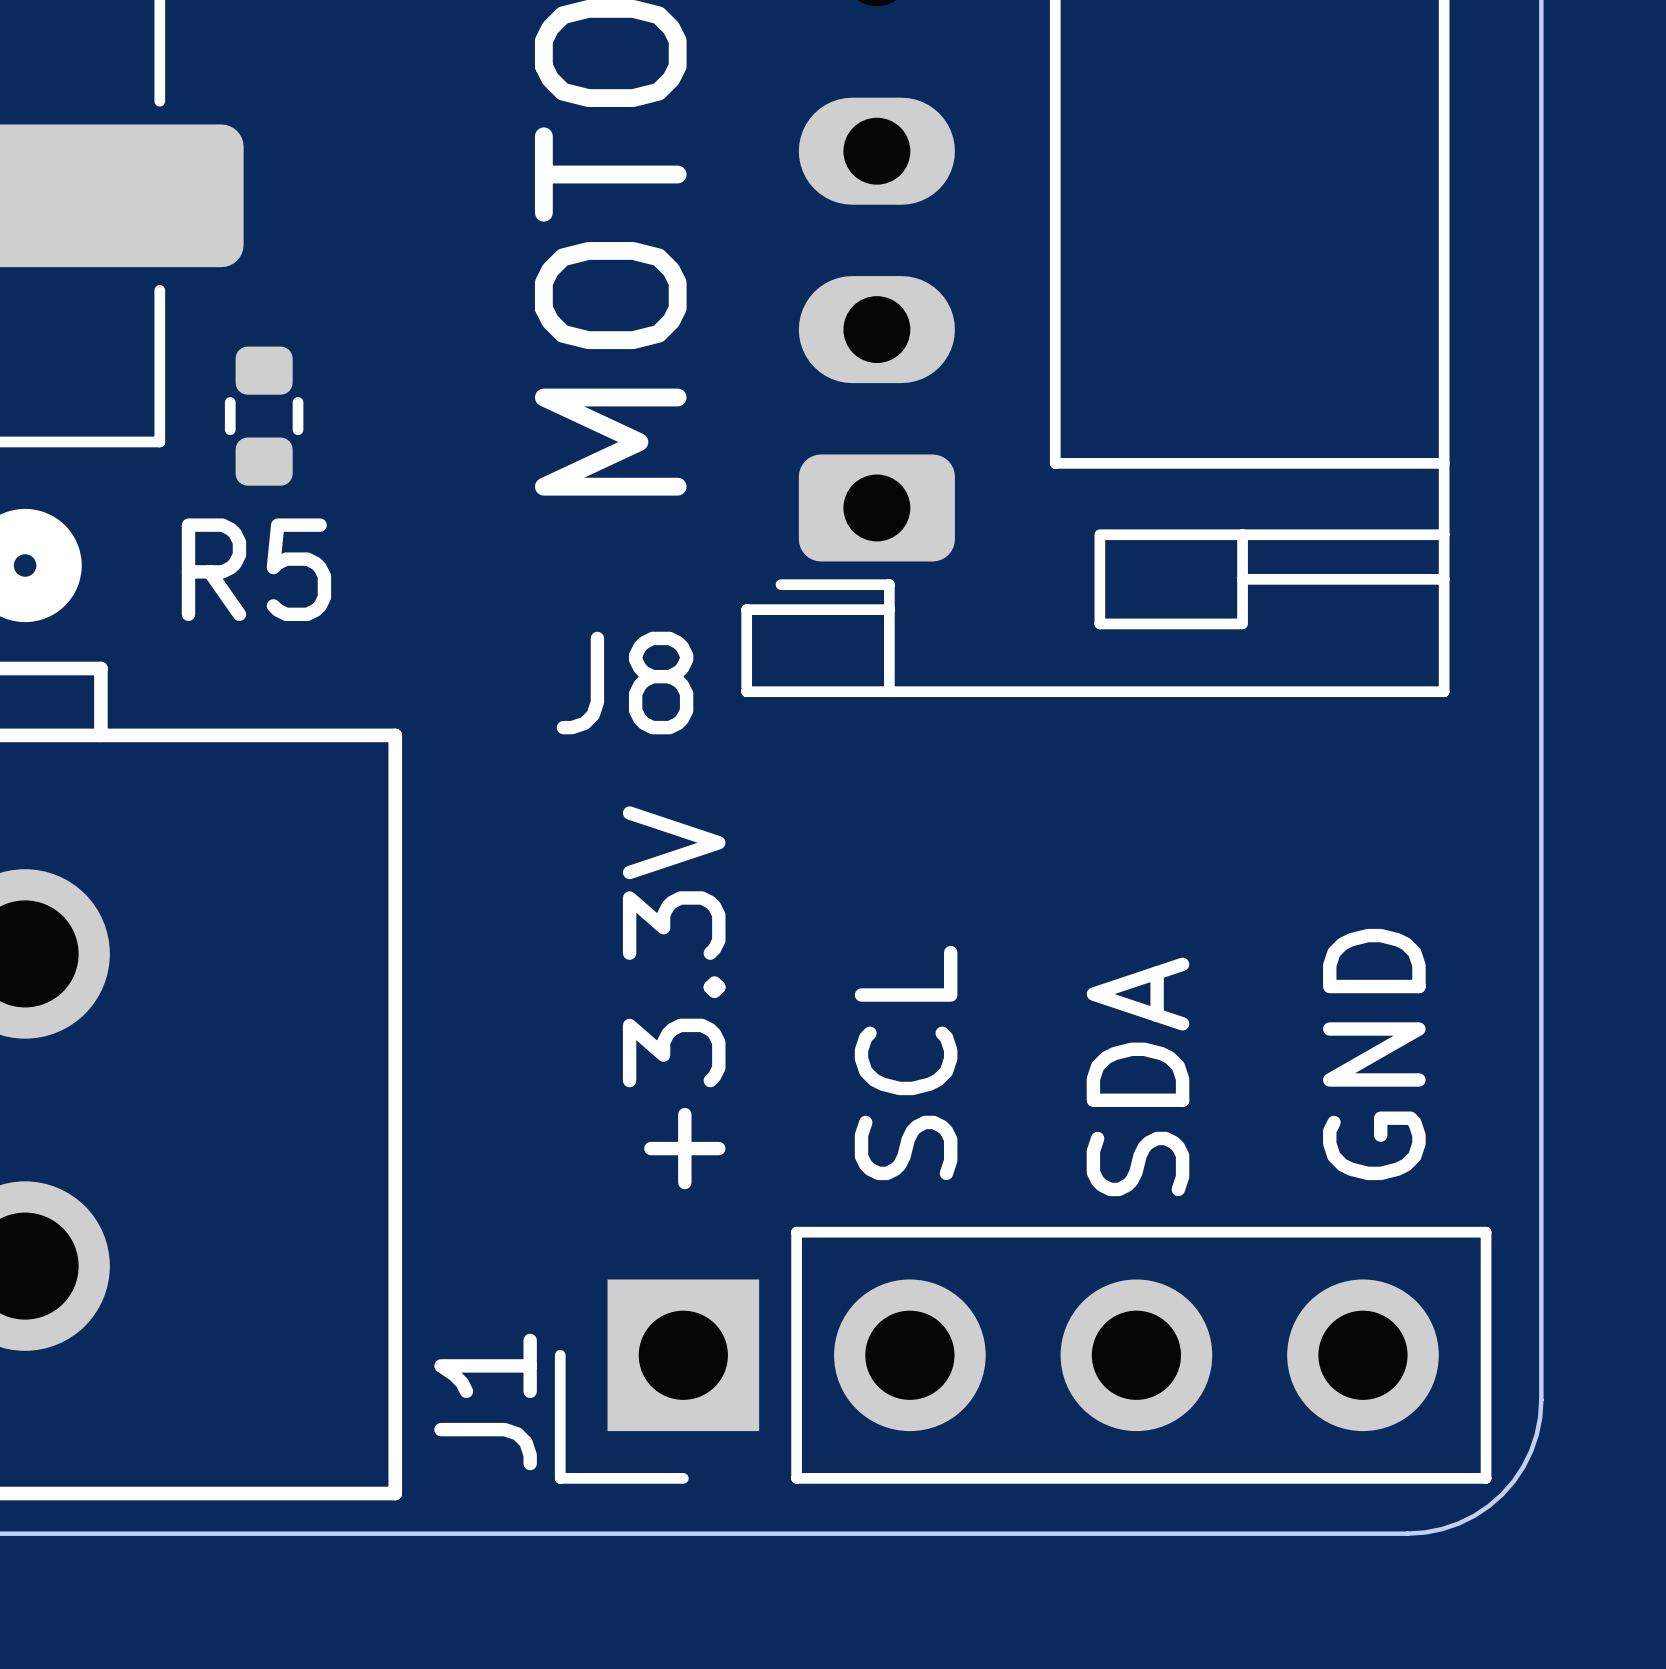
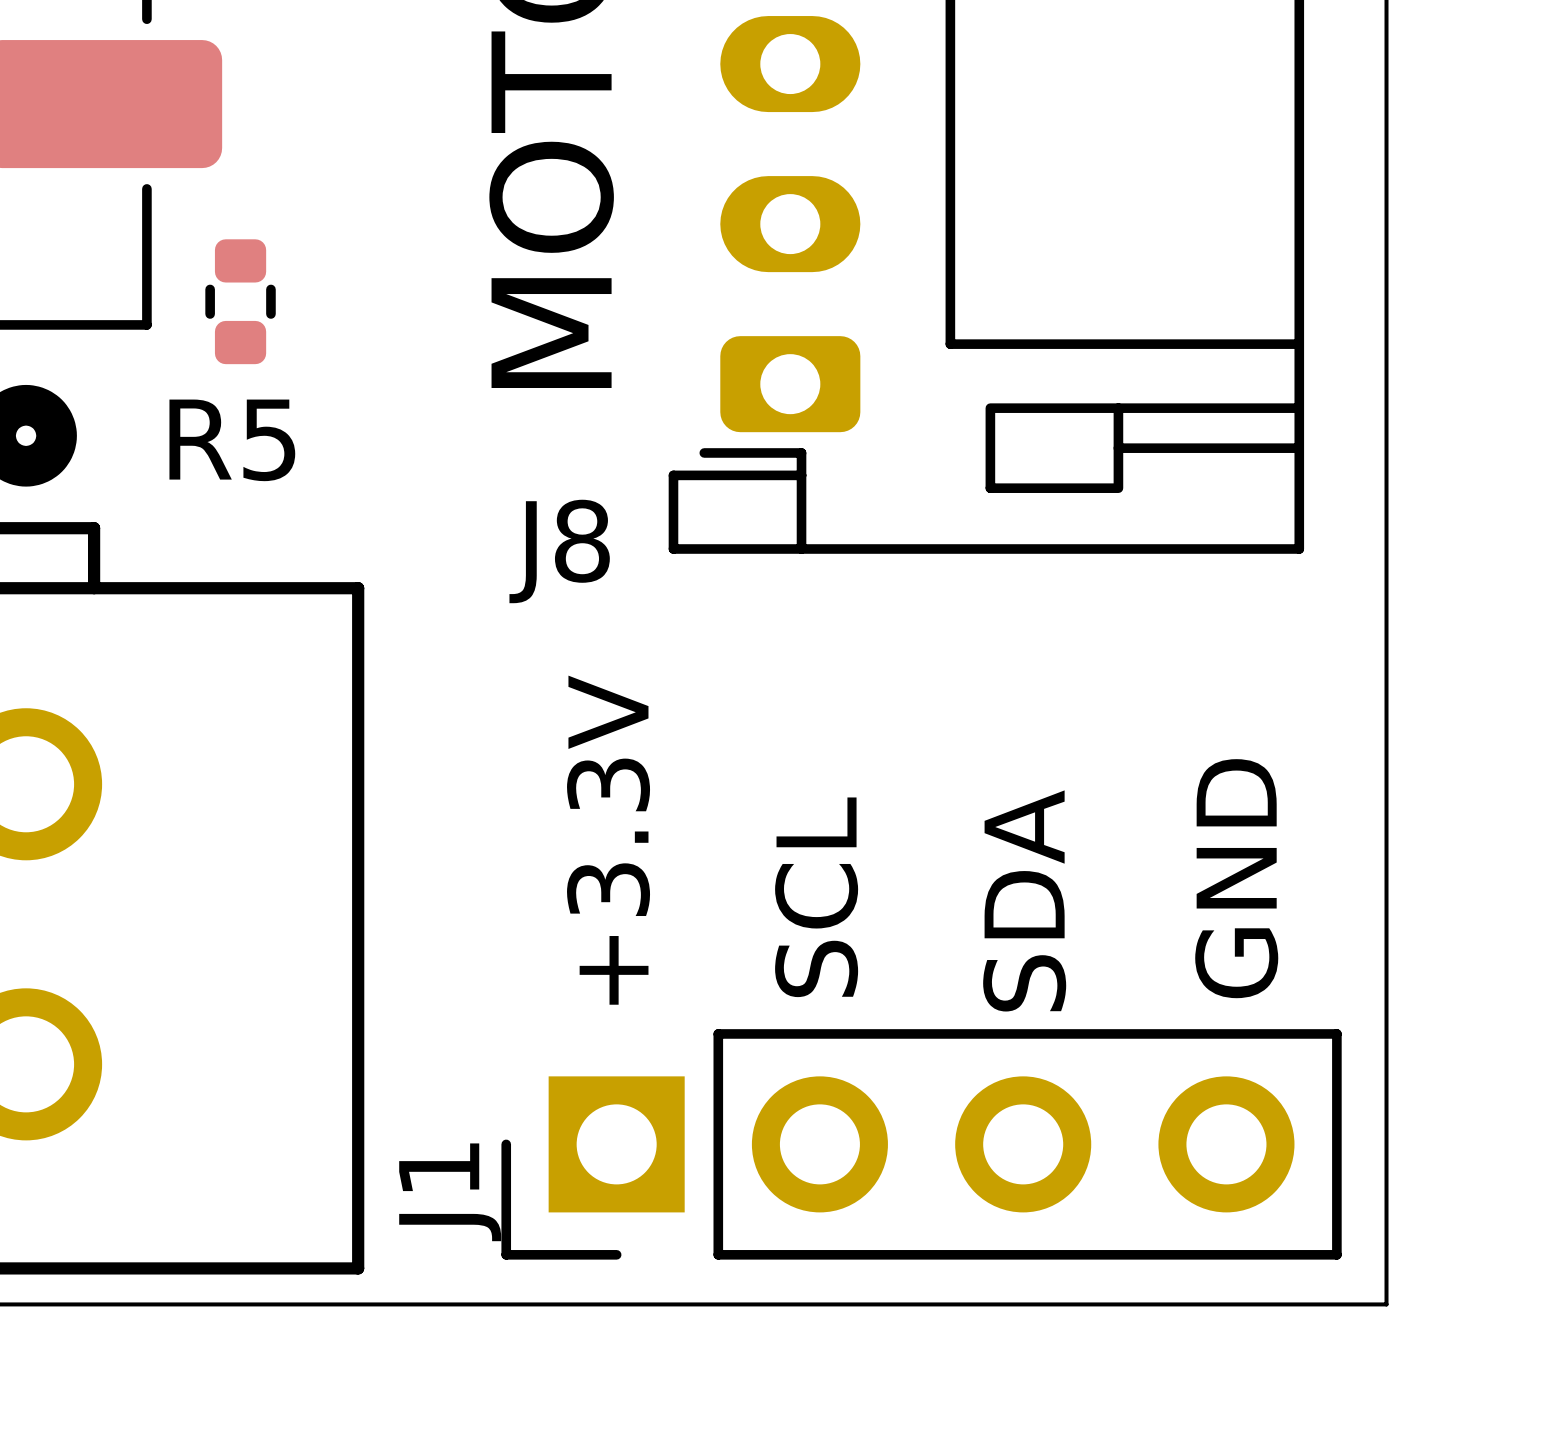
board edge: (1541, 1399) (1540, 1417) (1531, 1451) (1513, 1481) (1502, 1494) (1489, 1506) (1458, 1523) (1442, 1529) (1407, 1533) -> (1386, 1184) (1386, 1304) (1266, 1304)

